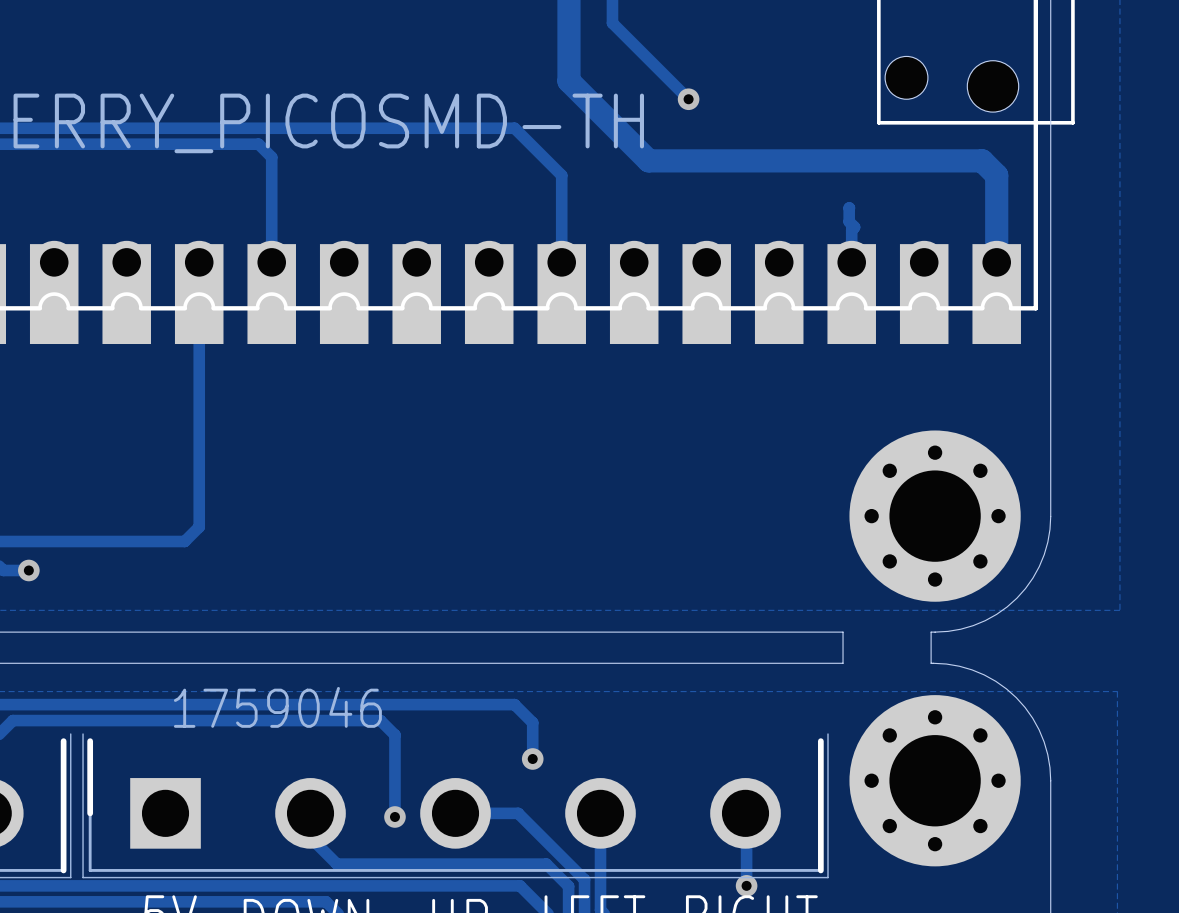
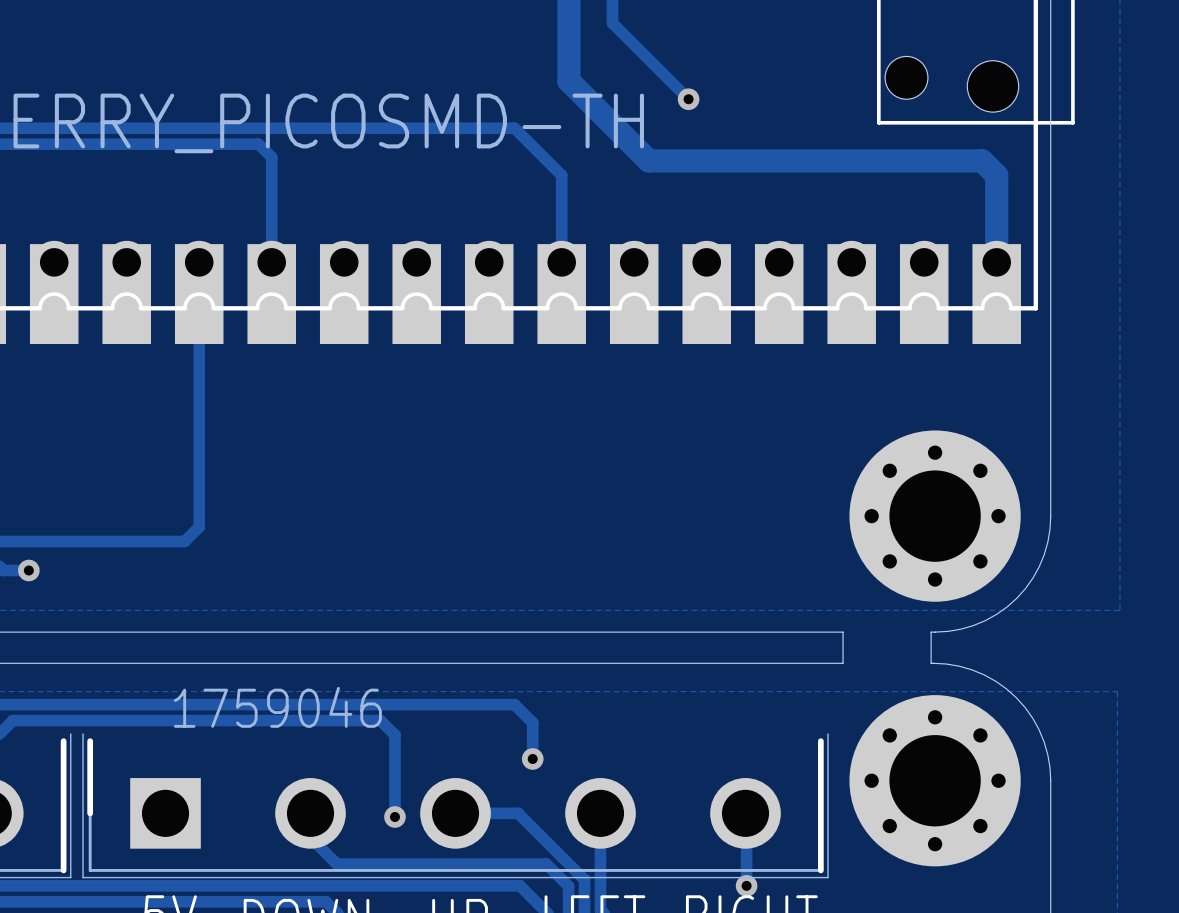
track: (849, 208) (849, 221) (854, 227) (851, 230) (851, 294) -> none

